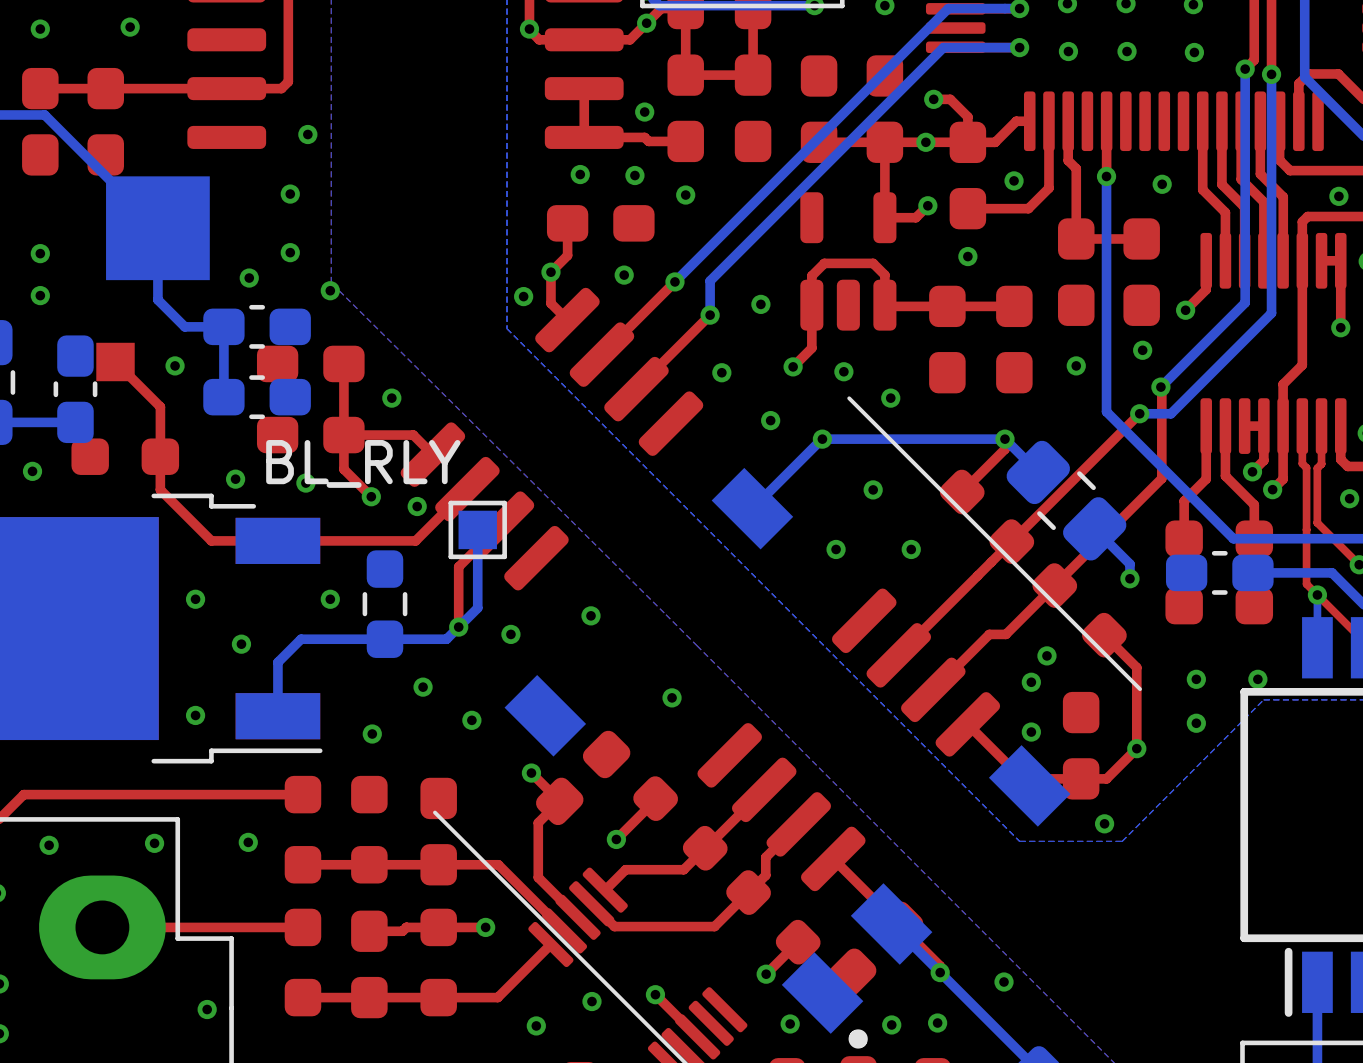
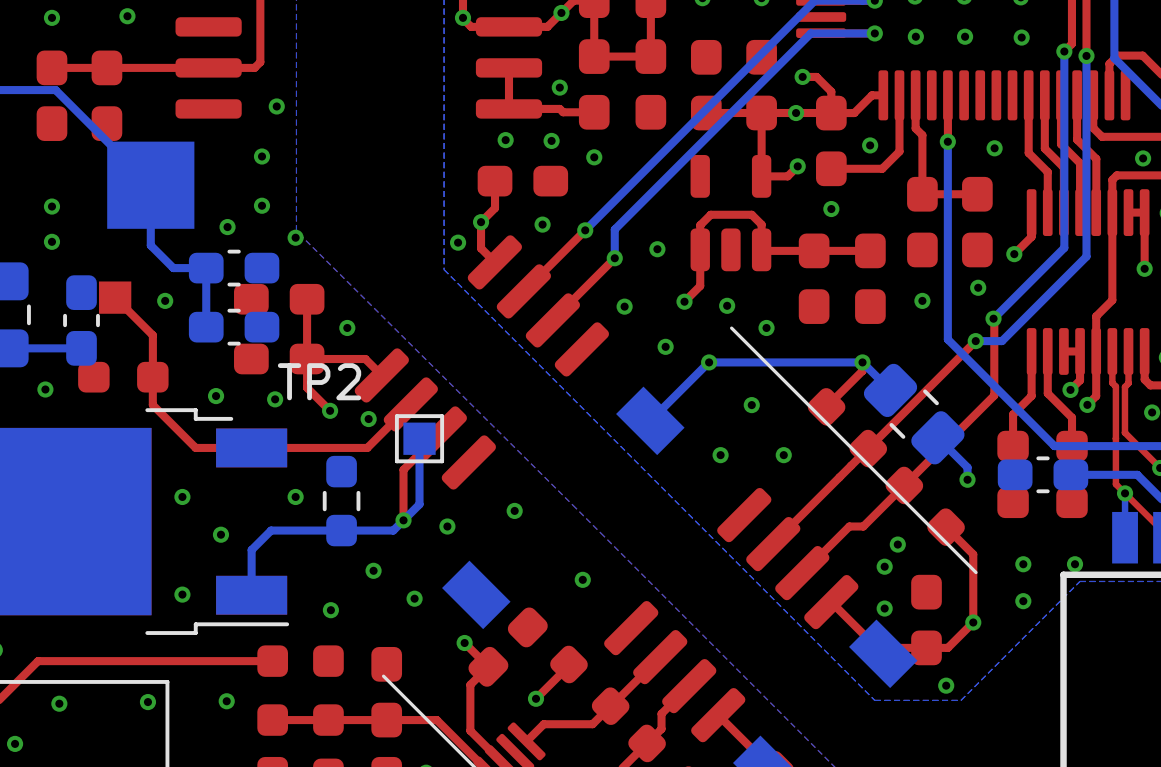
BL_RLY name: BL_RLY (363, 463) -> TP2 (319, 381)

